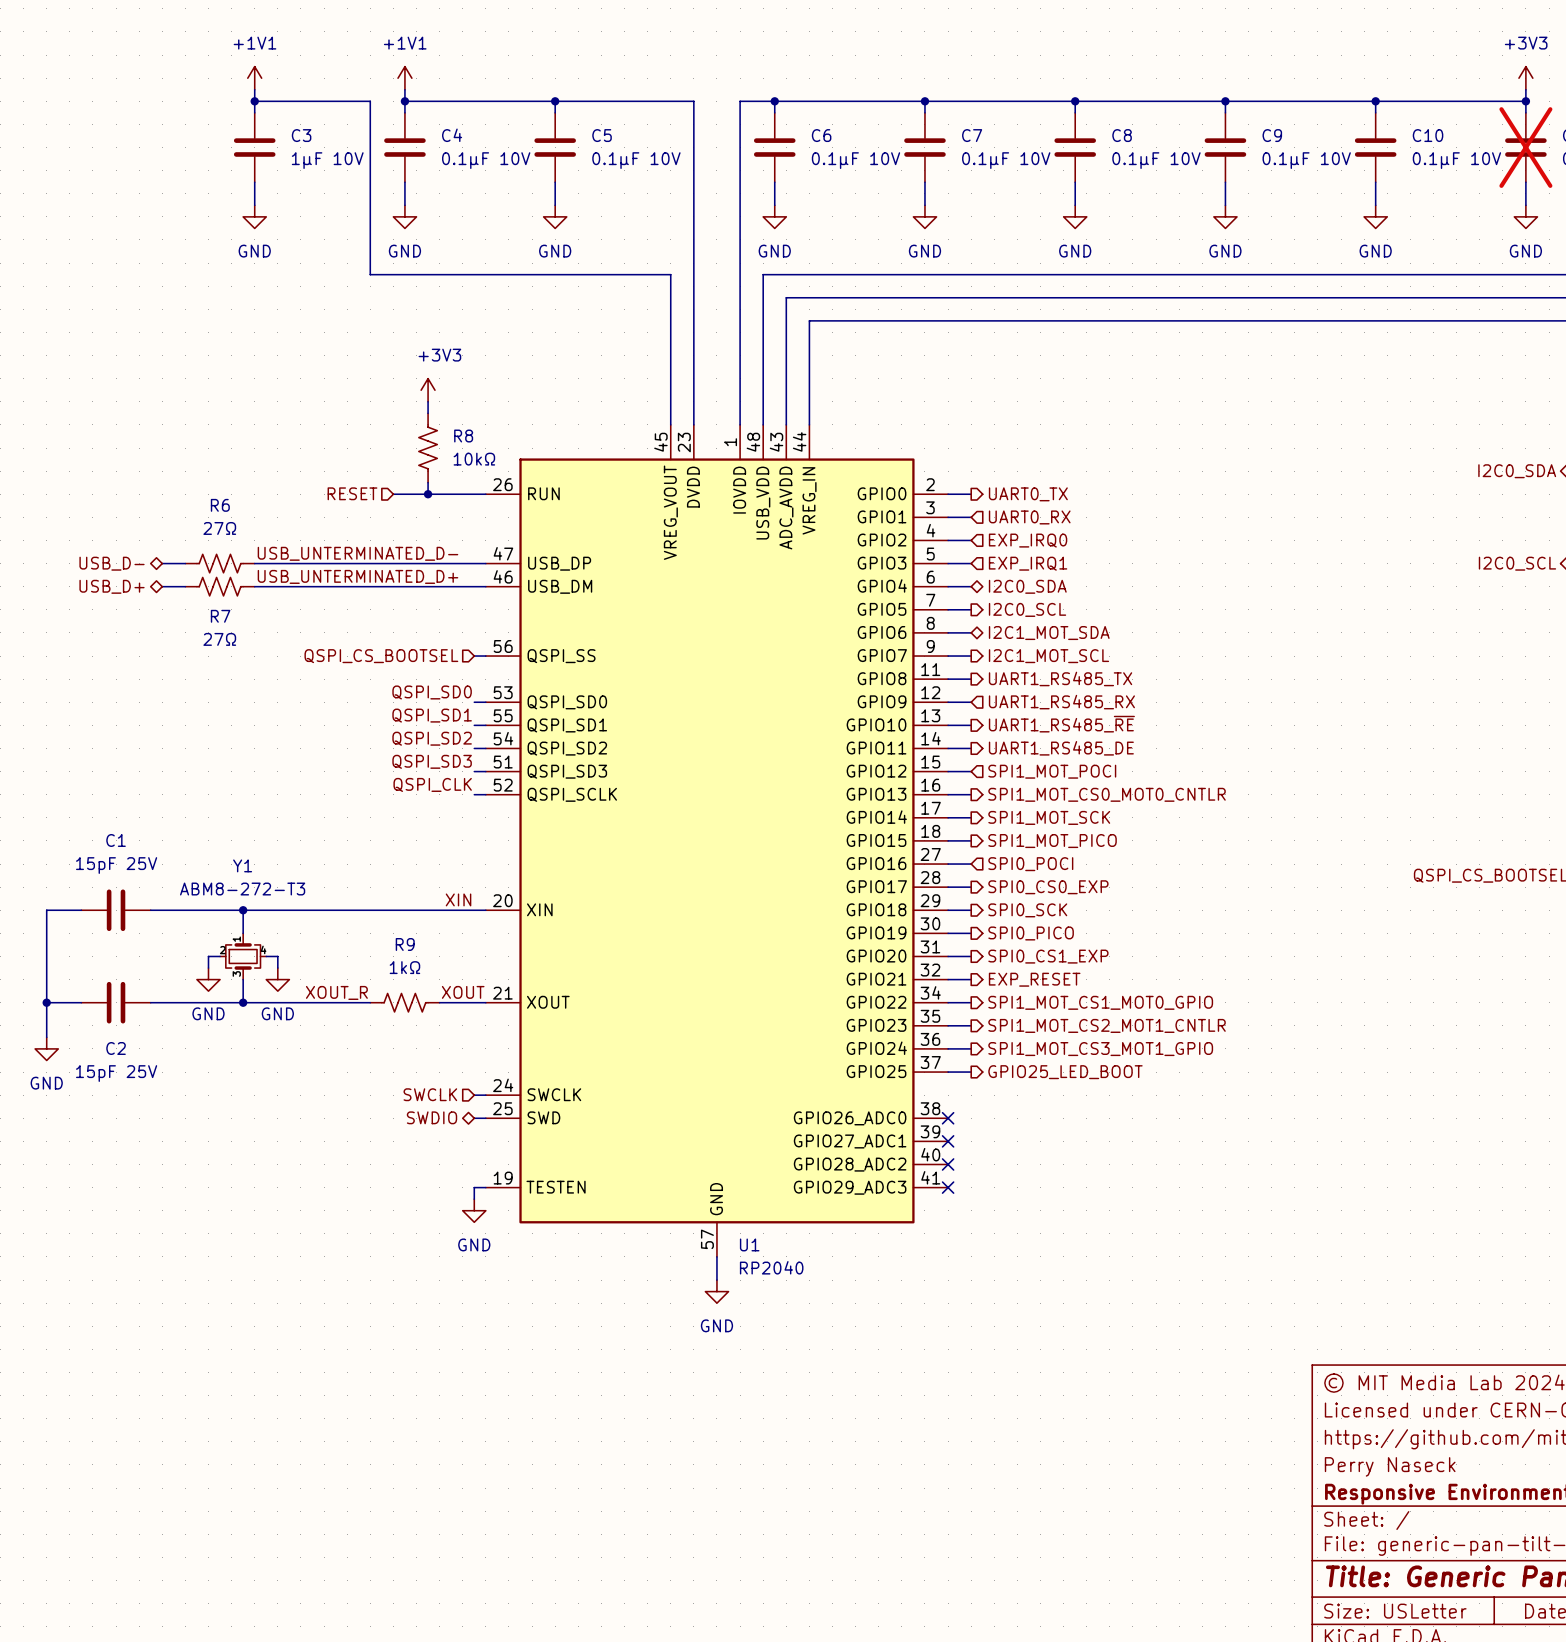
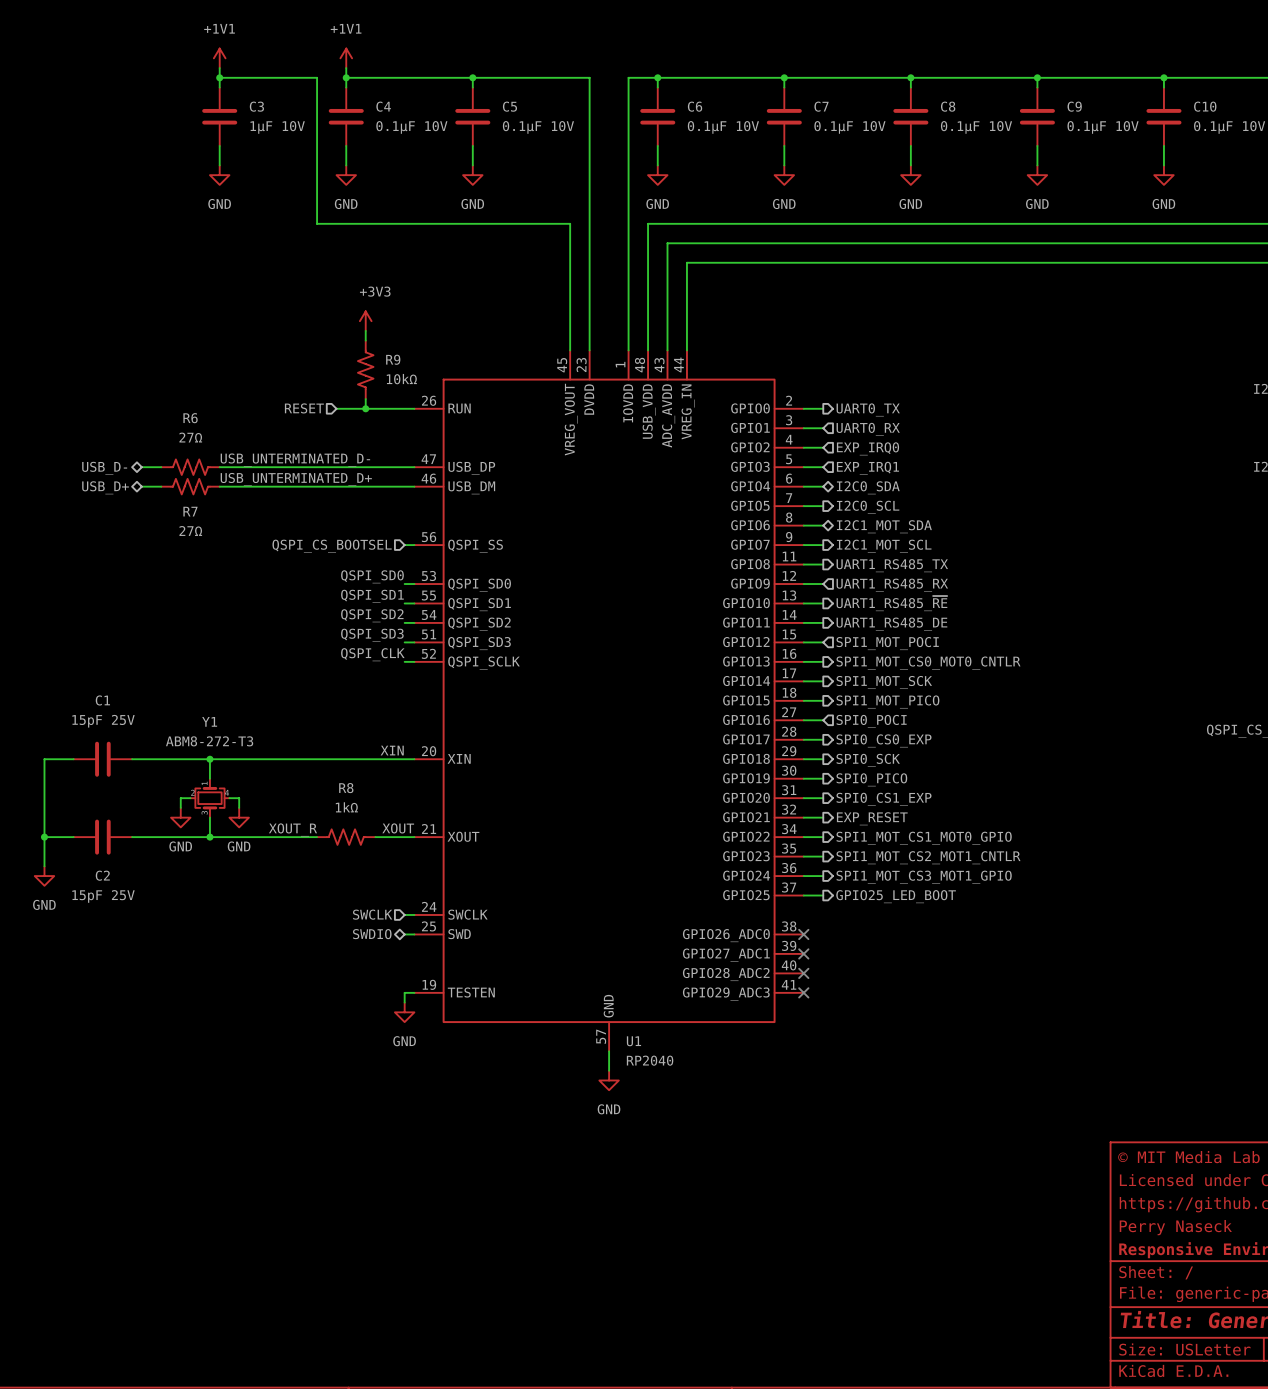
R8 name: R8 (463, 436) -> R9 (393, 359)
R9 name: R9 (405, 944) -> R8 (346, 788)

